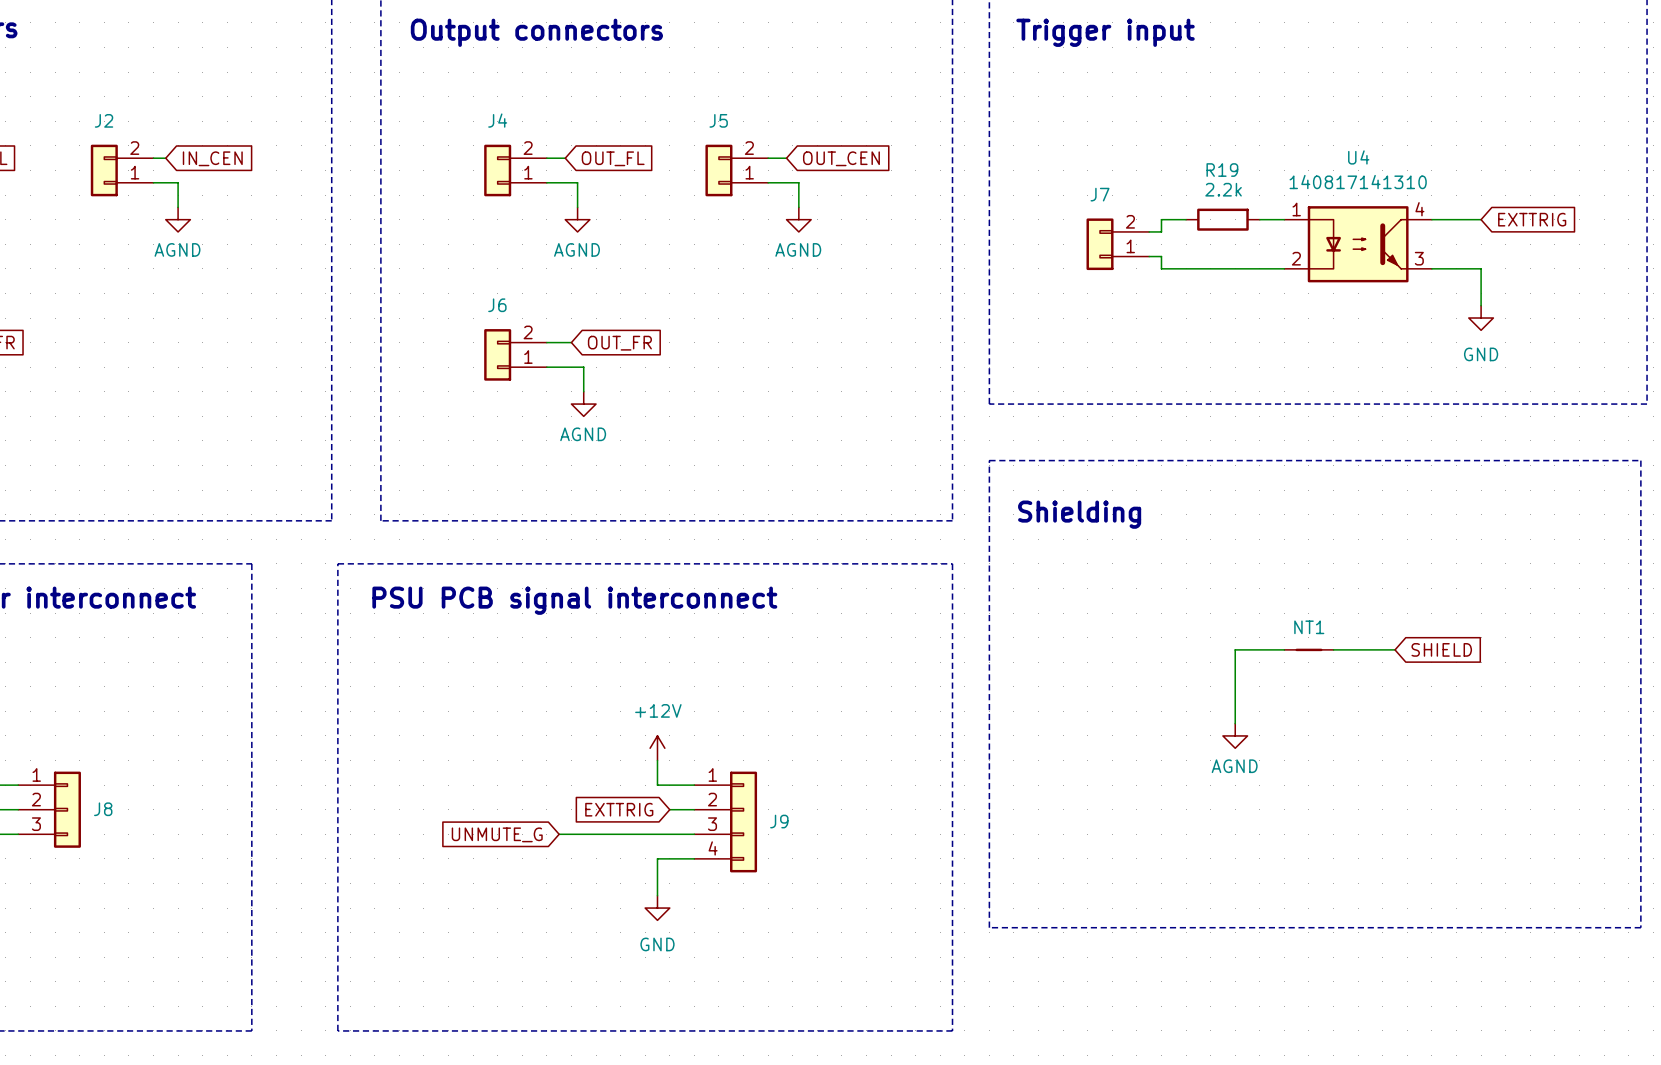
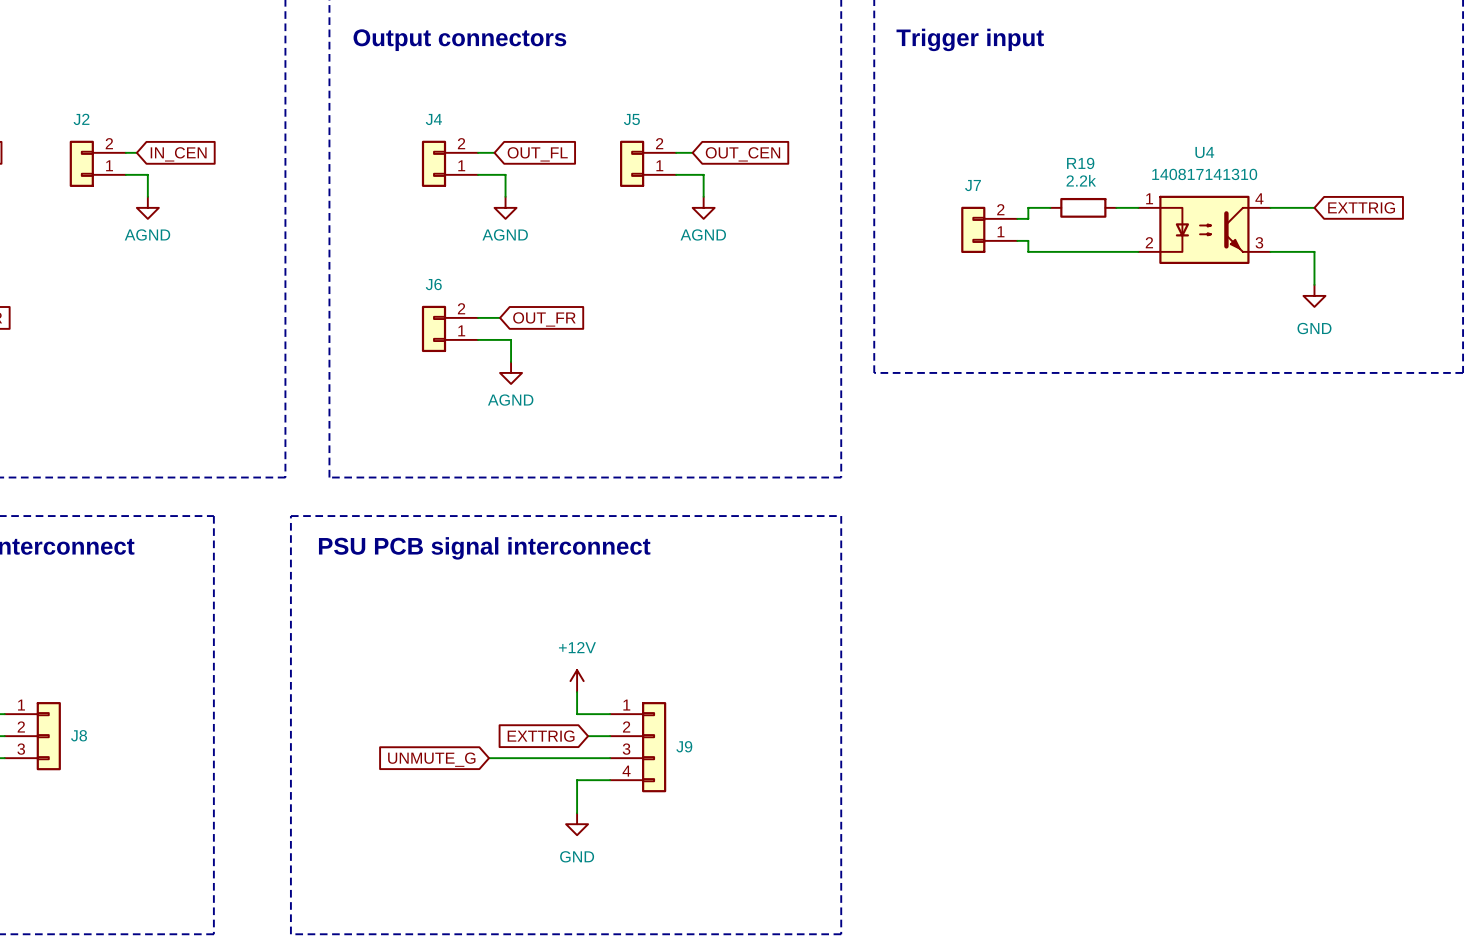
line: (989, 460) (1640, 460) (1640, 927) (989, 927) (989, 460) -> none
text: Shielding (1079, 514) -> none
wire: (1284, 649) (1235, 649) (1235, 723) -> none
NT1: (1308, 649) -> none
wire: (1333, 649) (1395, 649) -> none
global label: SHIELD (1441, 649) -> none
power symbol: AGND (1235, 735) -> none

